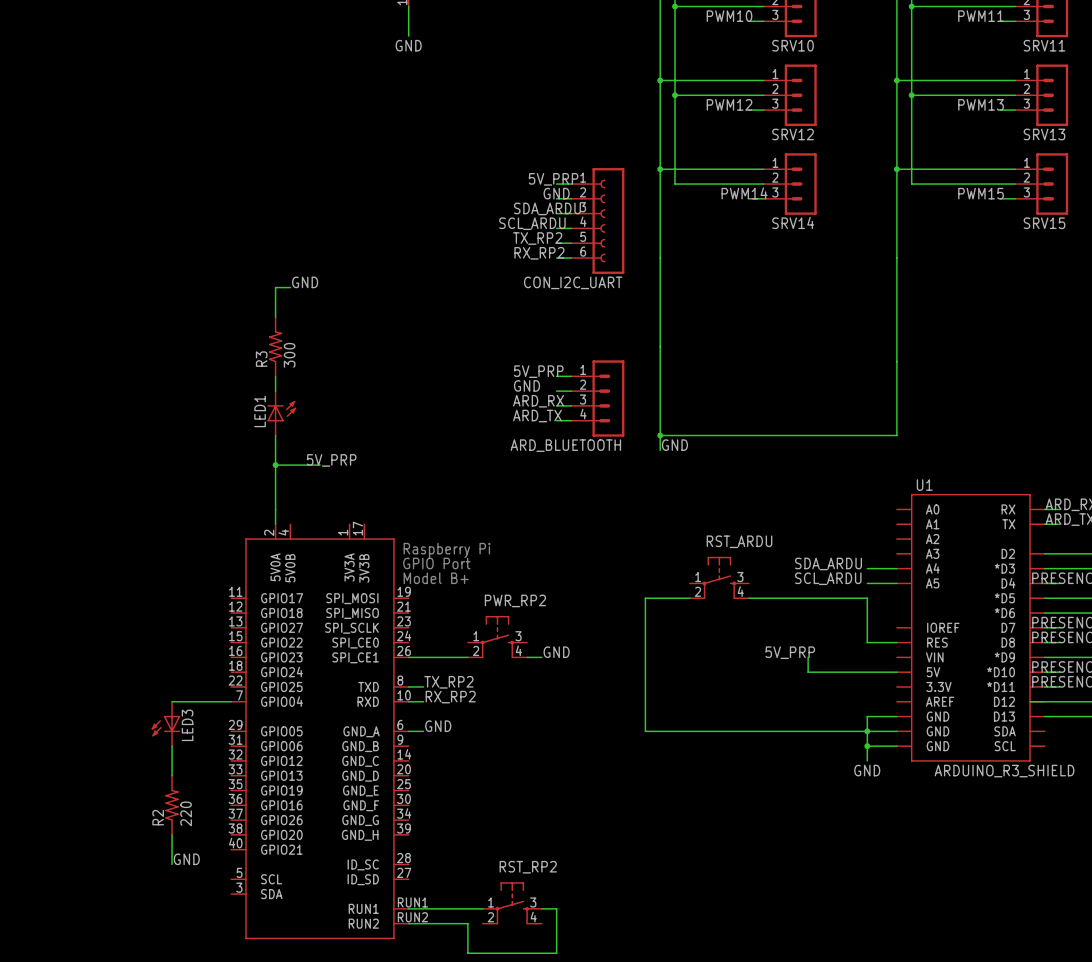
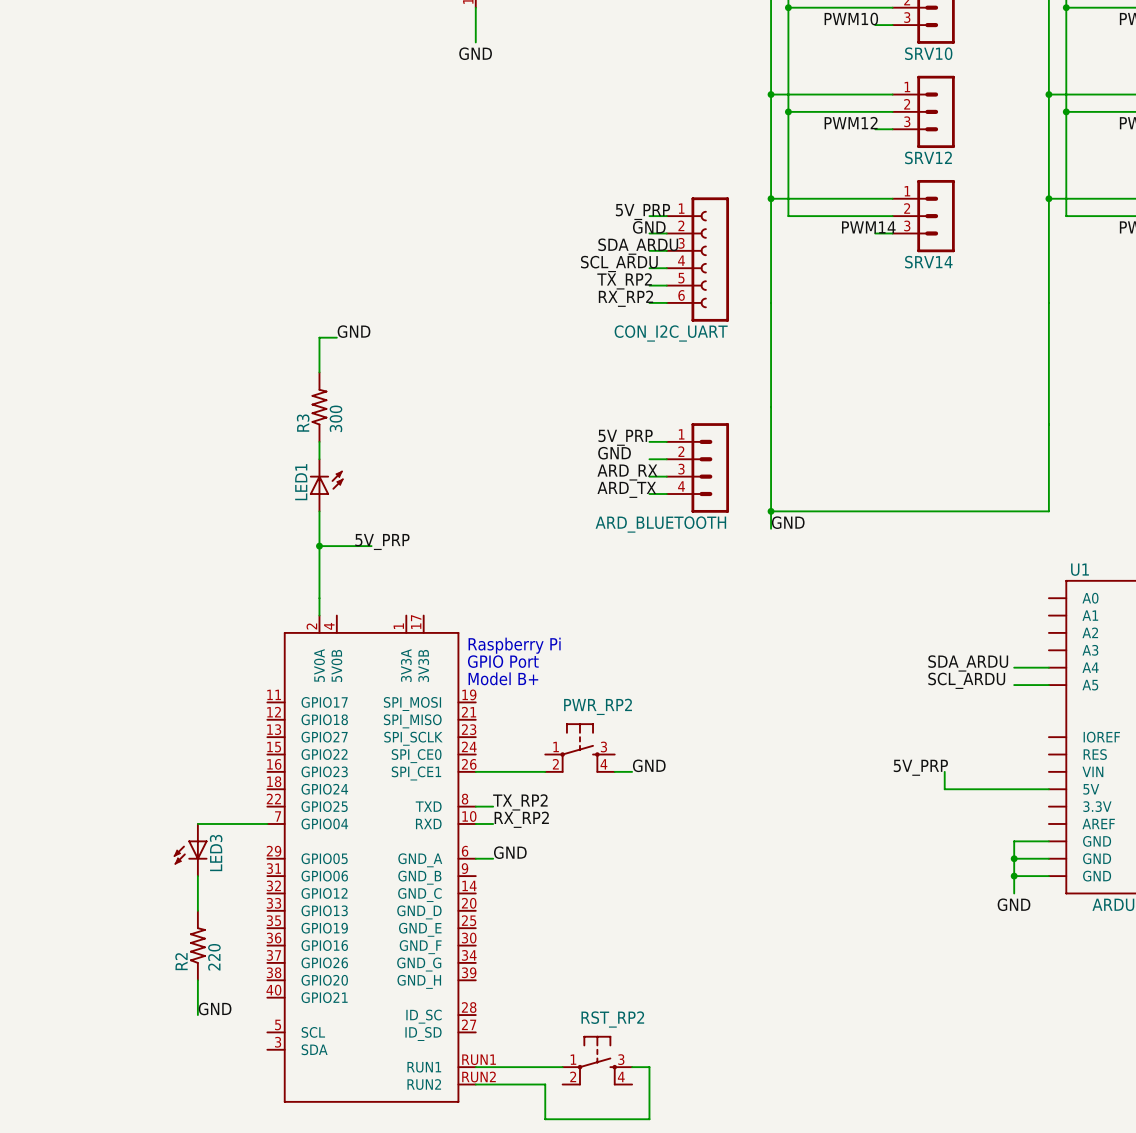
RST_ARDU: (719, 577) -> none
wire: (689, 598) (645, 598) (645, 731) (867, 731) -> none
wire: (748, 598) (867, 598) (867, 642) (896, 642) -> none

